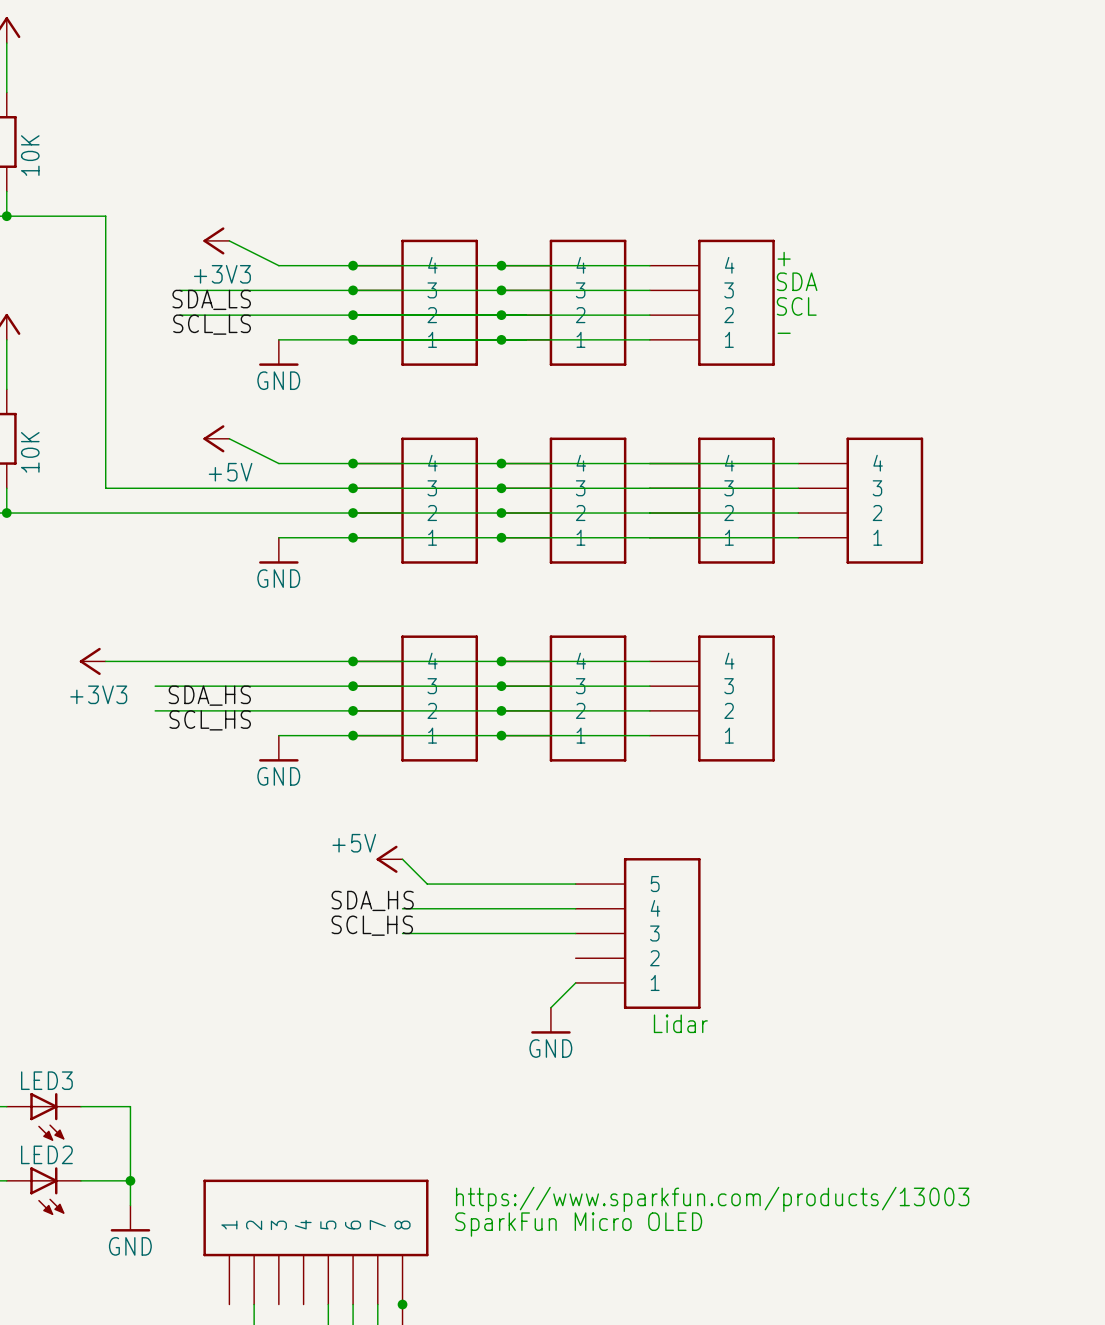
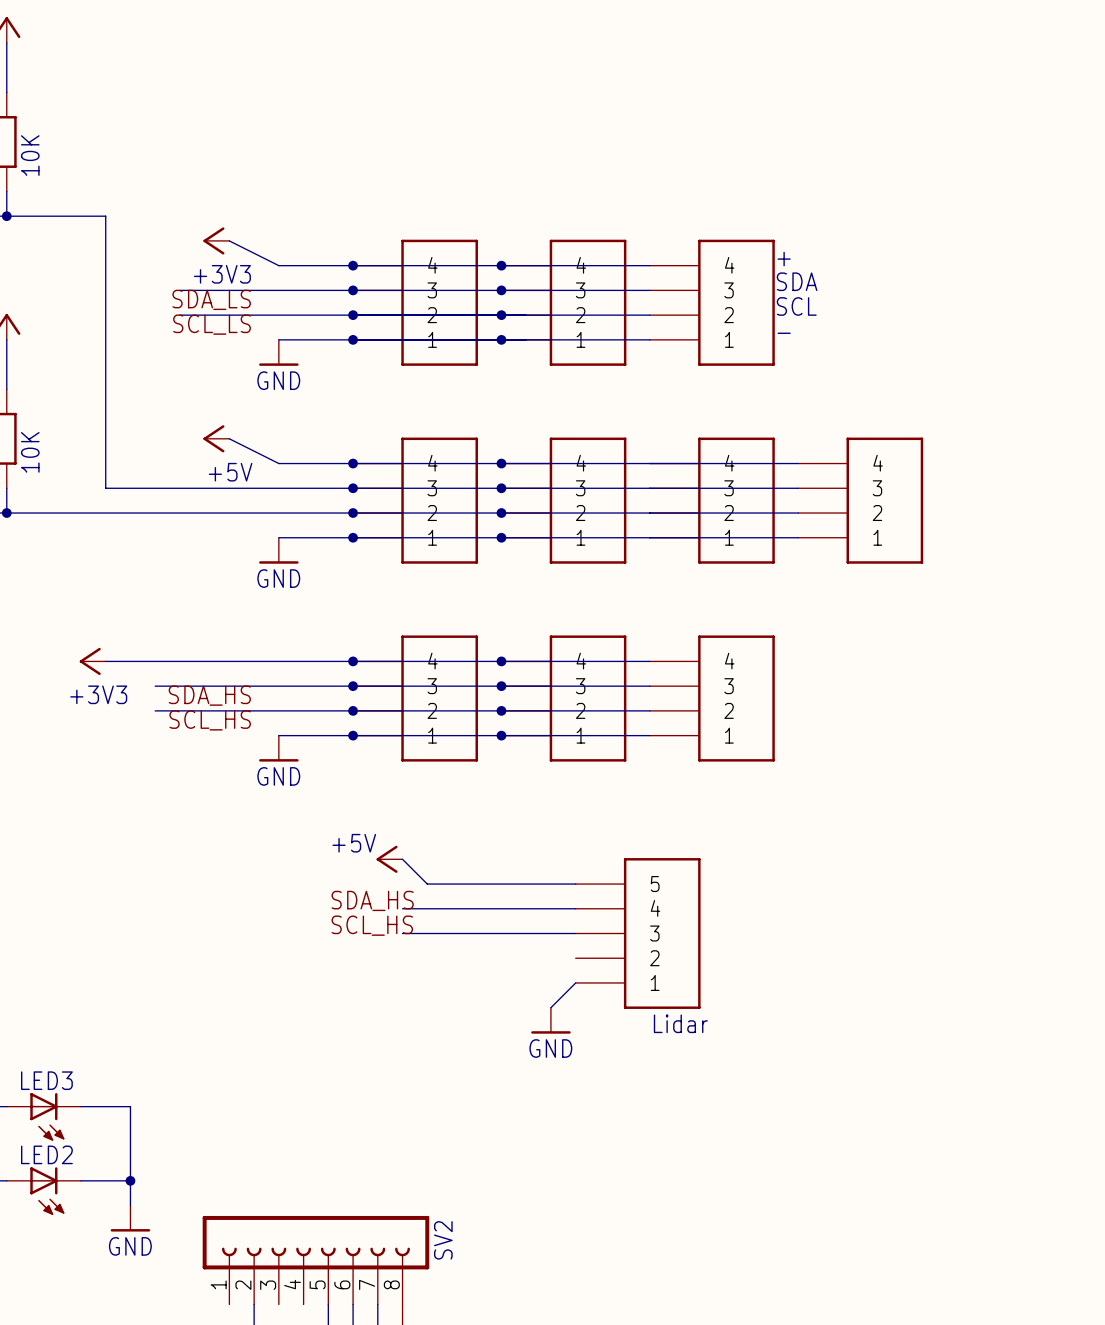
text: https://www.sparkfun.com/products/13003 (712, 1199) -> none
text: SparkFun Micro OLED (578, 1224) -> none
part: (315, 1242) -> none
SV2: none -> (315, 1260)
junction: (402, 1304) -> none

